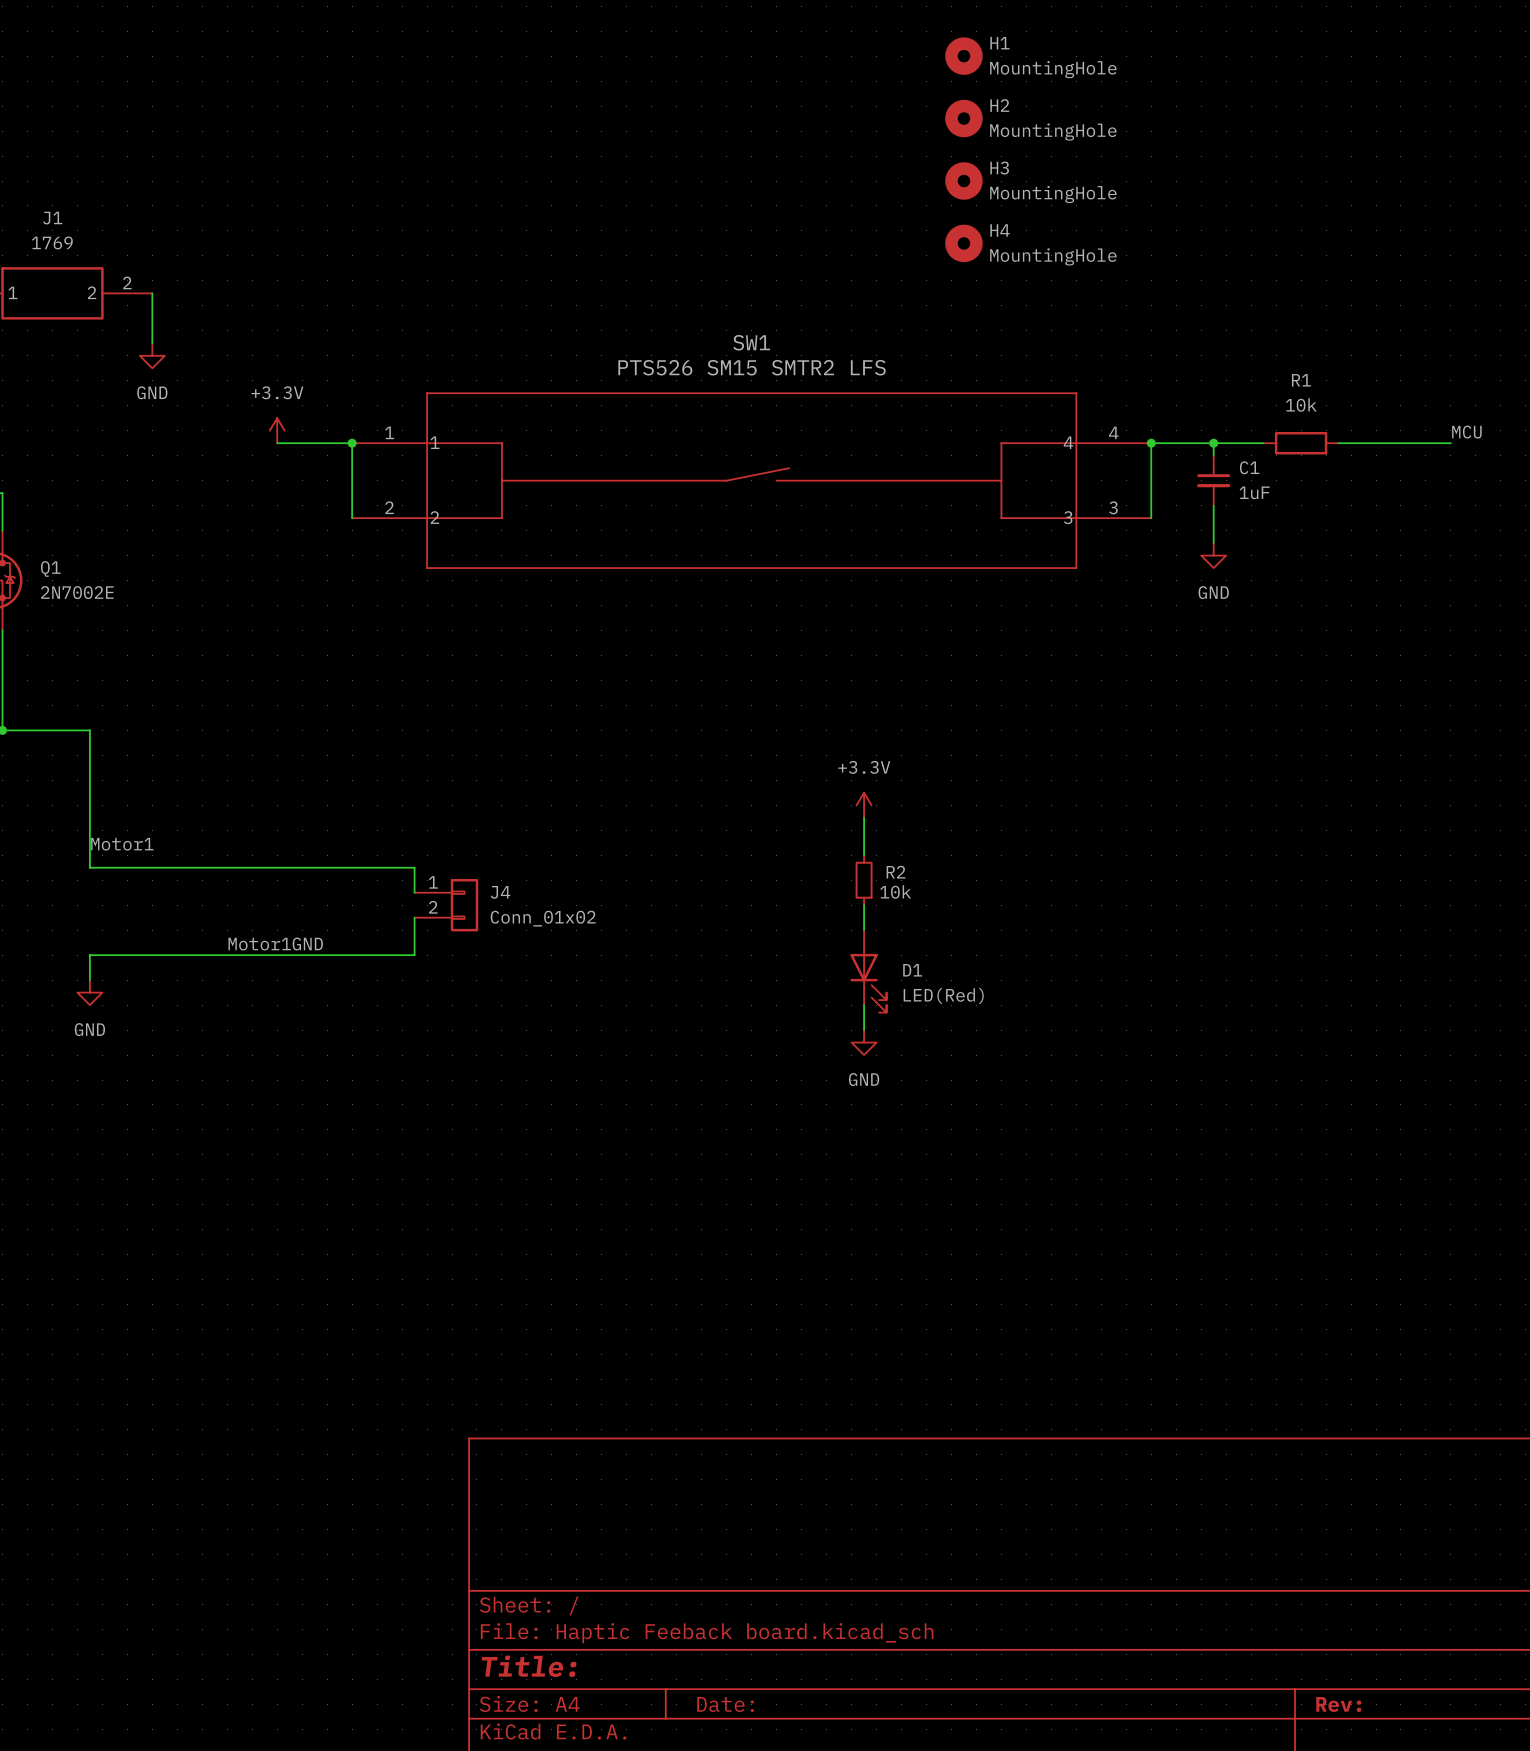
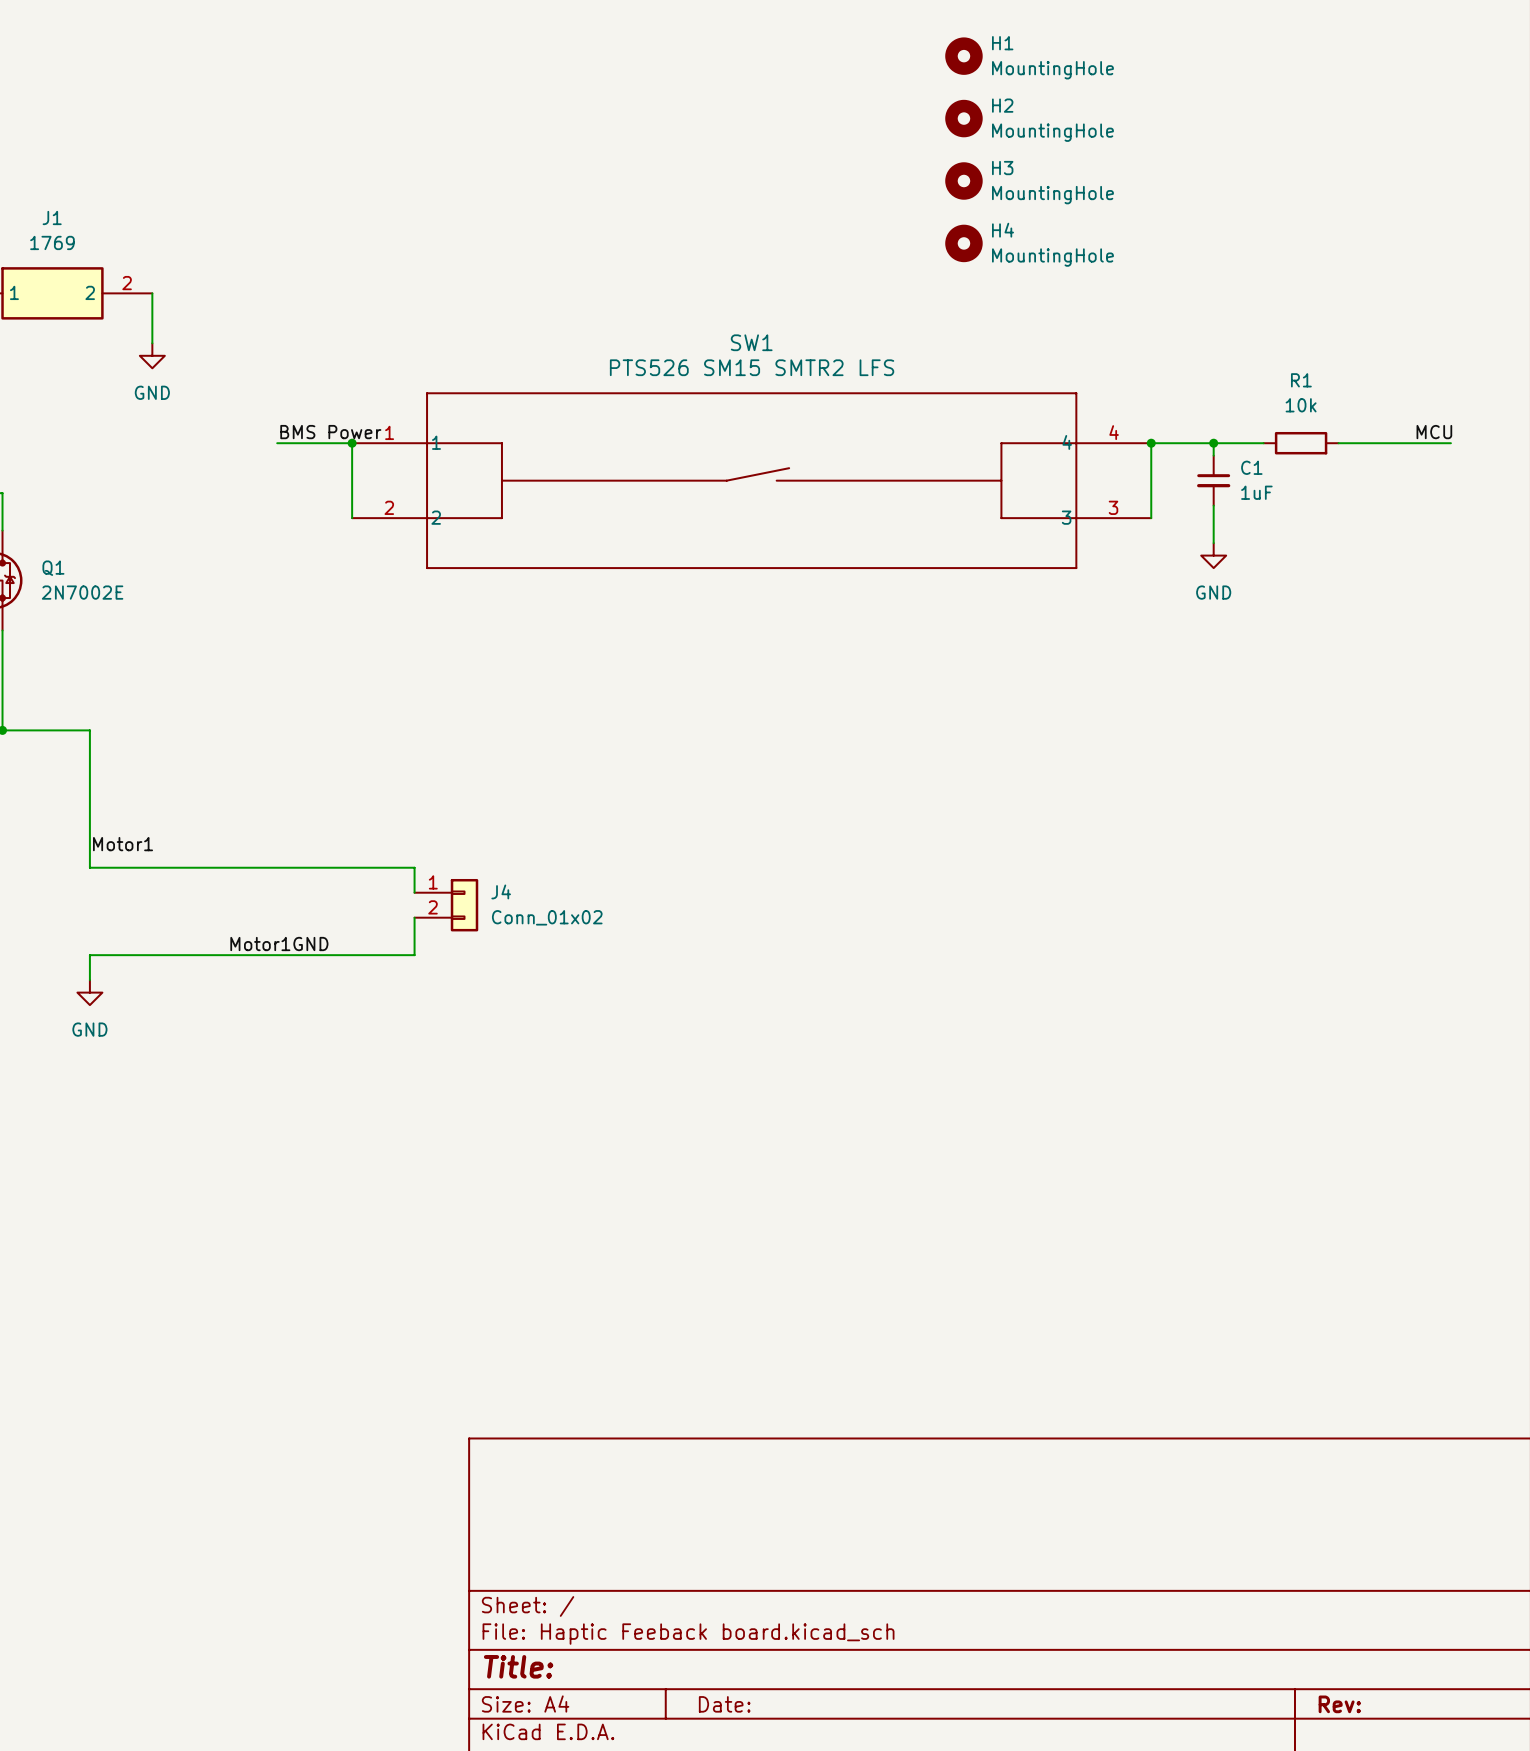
power symbol: +3.3V (277, 430) -> none
label: none -> BMS Power (330, 432)
label position: MCU (1466, 432) -> MCU (1434, 432)
power symbol: +3.3V (864, 805) -> none
wire: (864, 817) (864, 855) -> none
R2: 10k (864, 880) -> none
wire: (864, 905) (864, 930) -> none
D1: LED(Red) (868, 971) -> none
wire: (864, 1005) (864, 1030) -> none
power symbol: GND (864, 1042) -> none

